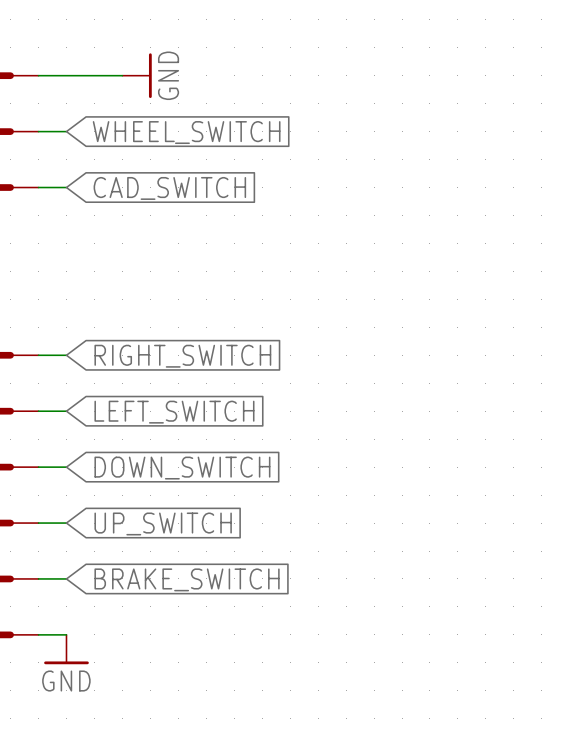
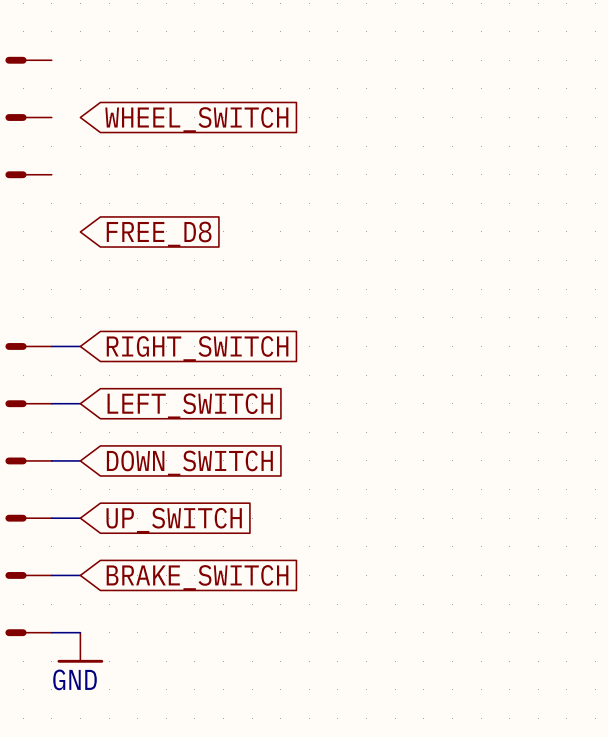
wire: (38, 75) (122, 75) -> none
power symbol: GND (137, 75) -> none
wire: (38, 131) (66, 131) -> none
wire: (38, 187) (66, 187) -> none
global label: CAD_SWITCH (169, 188) -> none
global label: none -> FREE_D8 (159, 234)

